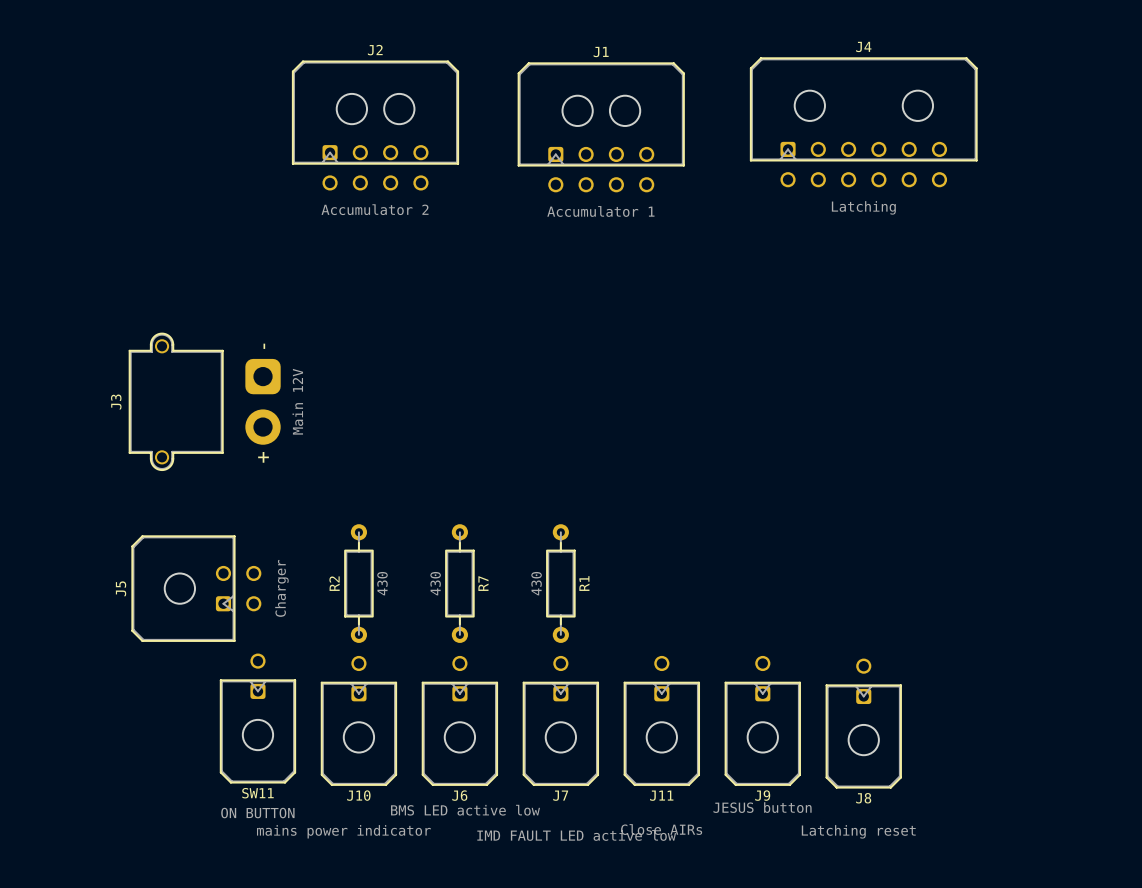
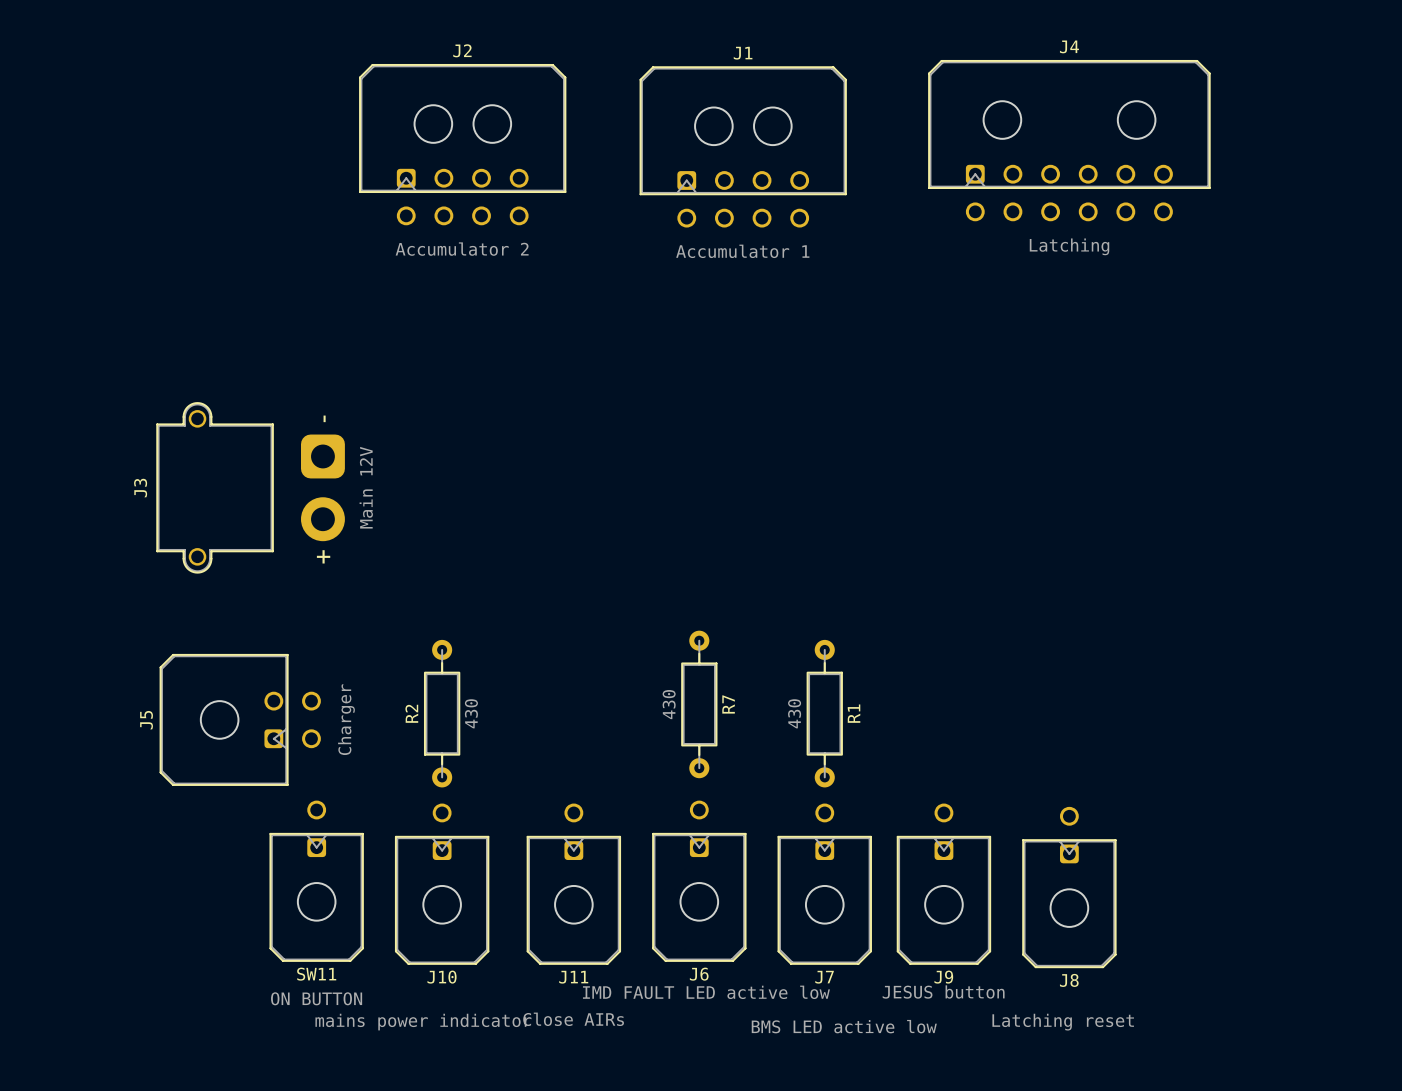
R7 position: (459, 583) -> (699, 704)
R1 position: (560, 583) -> (824, 713)
J6 position: (459, 720) -> (699, 881)
J7 position: (560, 720) -> (824, 884)
J11 position: (661, 720) -> (573, 884)
J6 value: BMS LED active low (465, 810) -> IMD FAULT LED active low (706, 992)
J7 value: IMD FAULT LED active low (576, 835) -> BMS LED active low (844, 1026)

